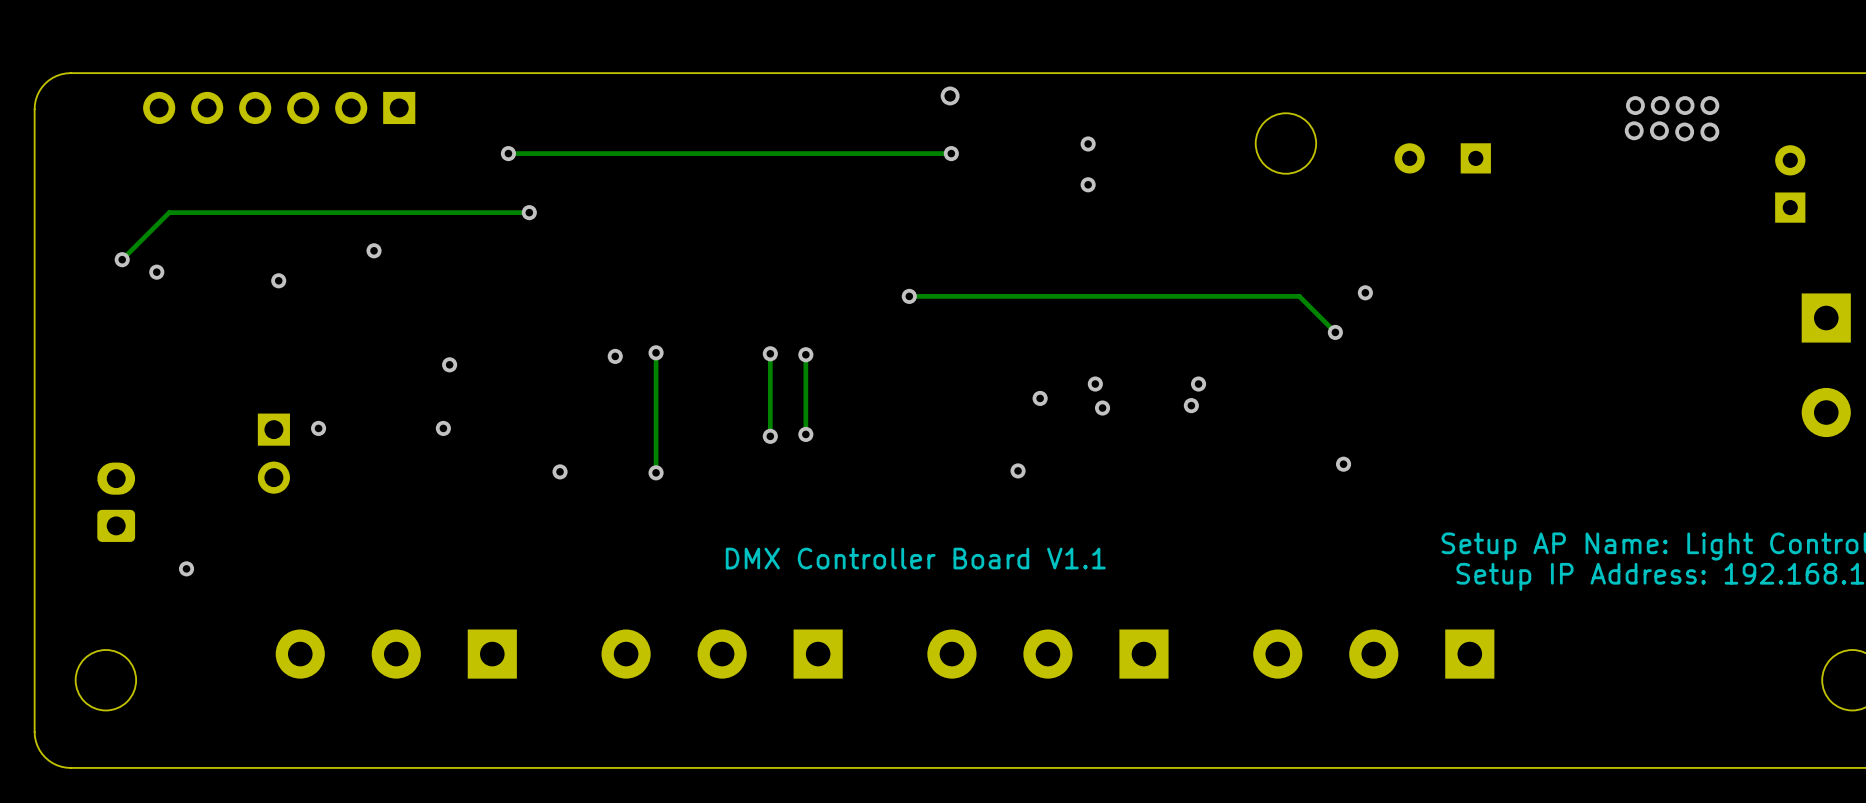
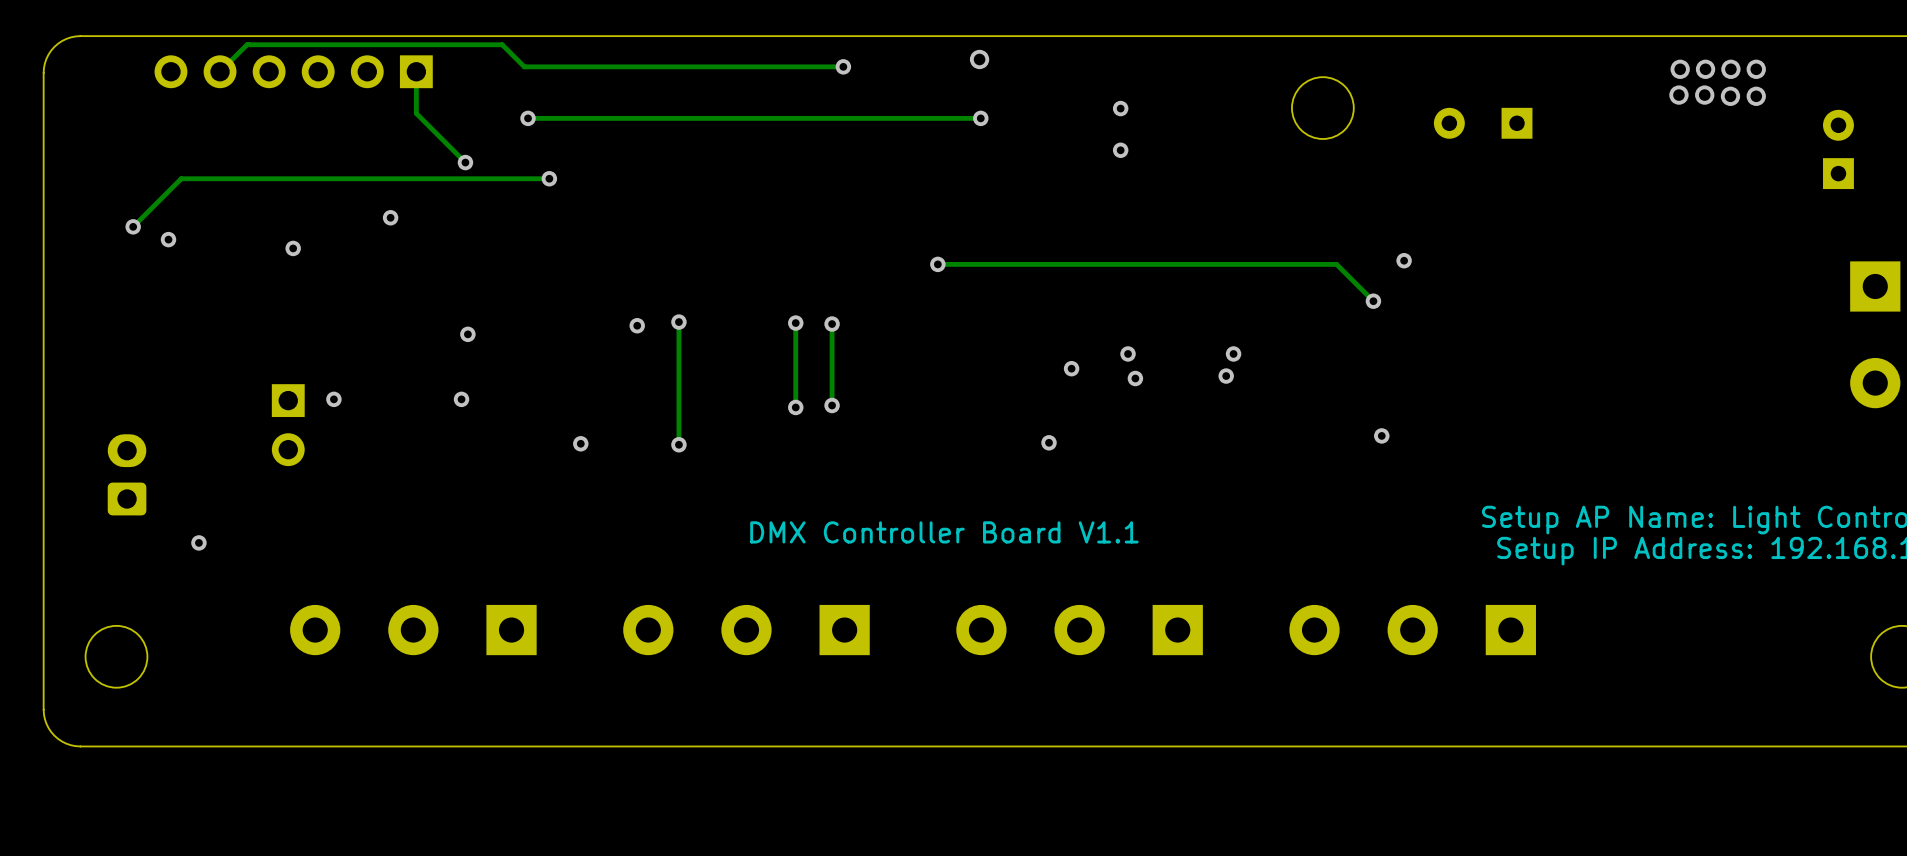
track: none -> (843, 66) (524, 66) (502, 44) (247, 44) (220, 71)
via: none -> (843, 66)
track: none -> (416, 71) (416, 113) (465, 162)
via: none -> (465, 162)

